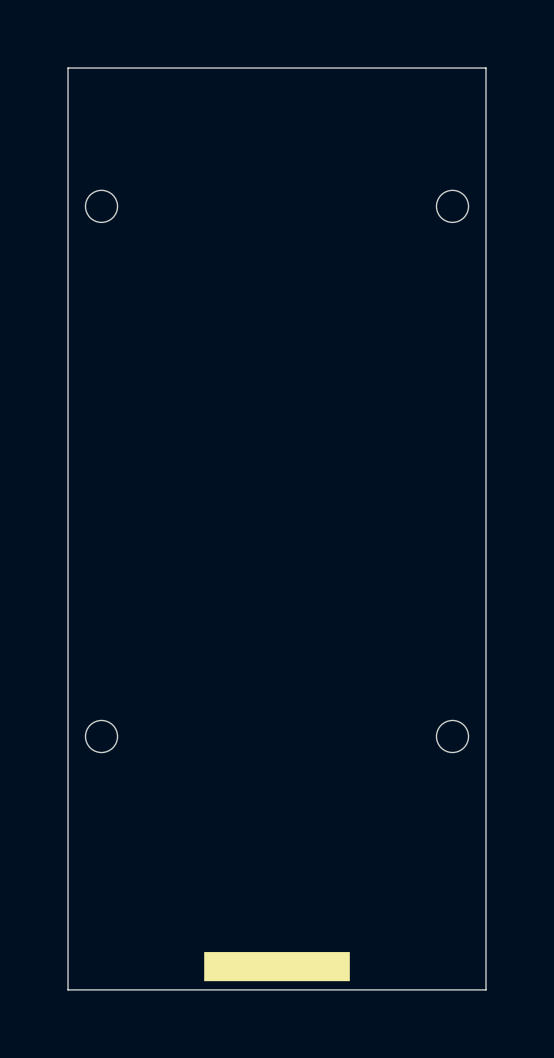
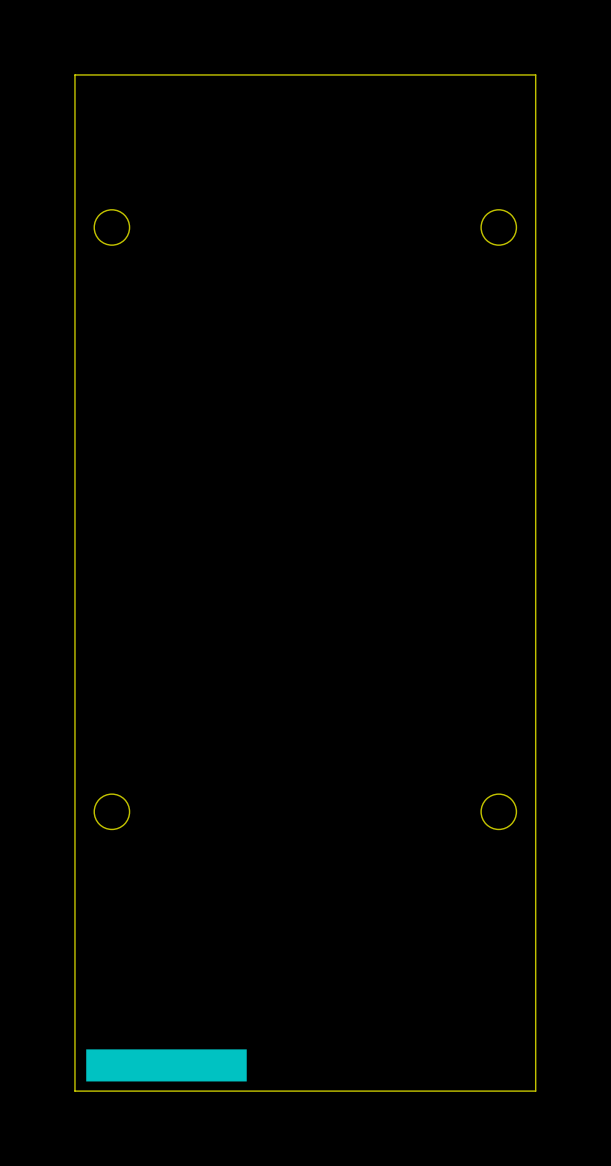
drawing position: (277, 966) -> (166, 1065)

